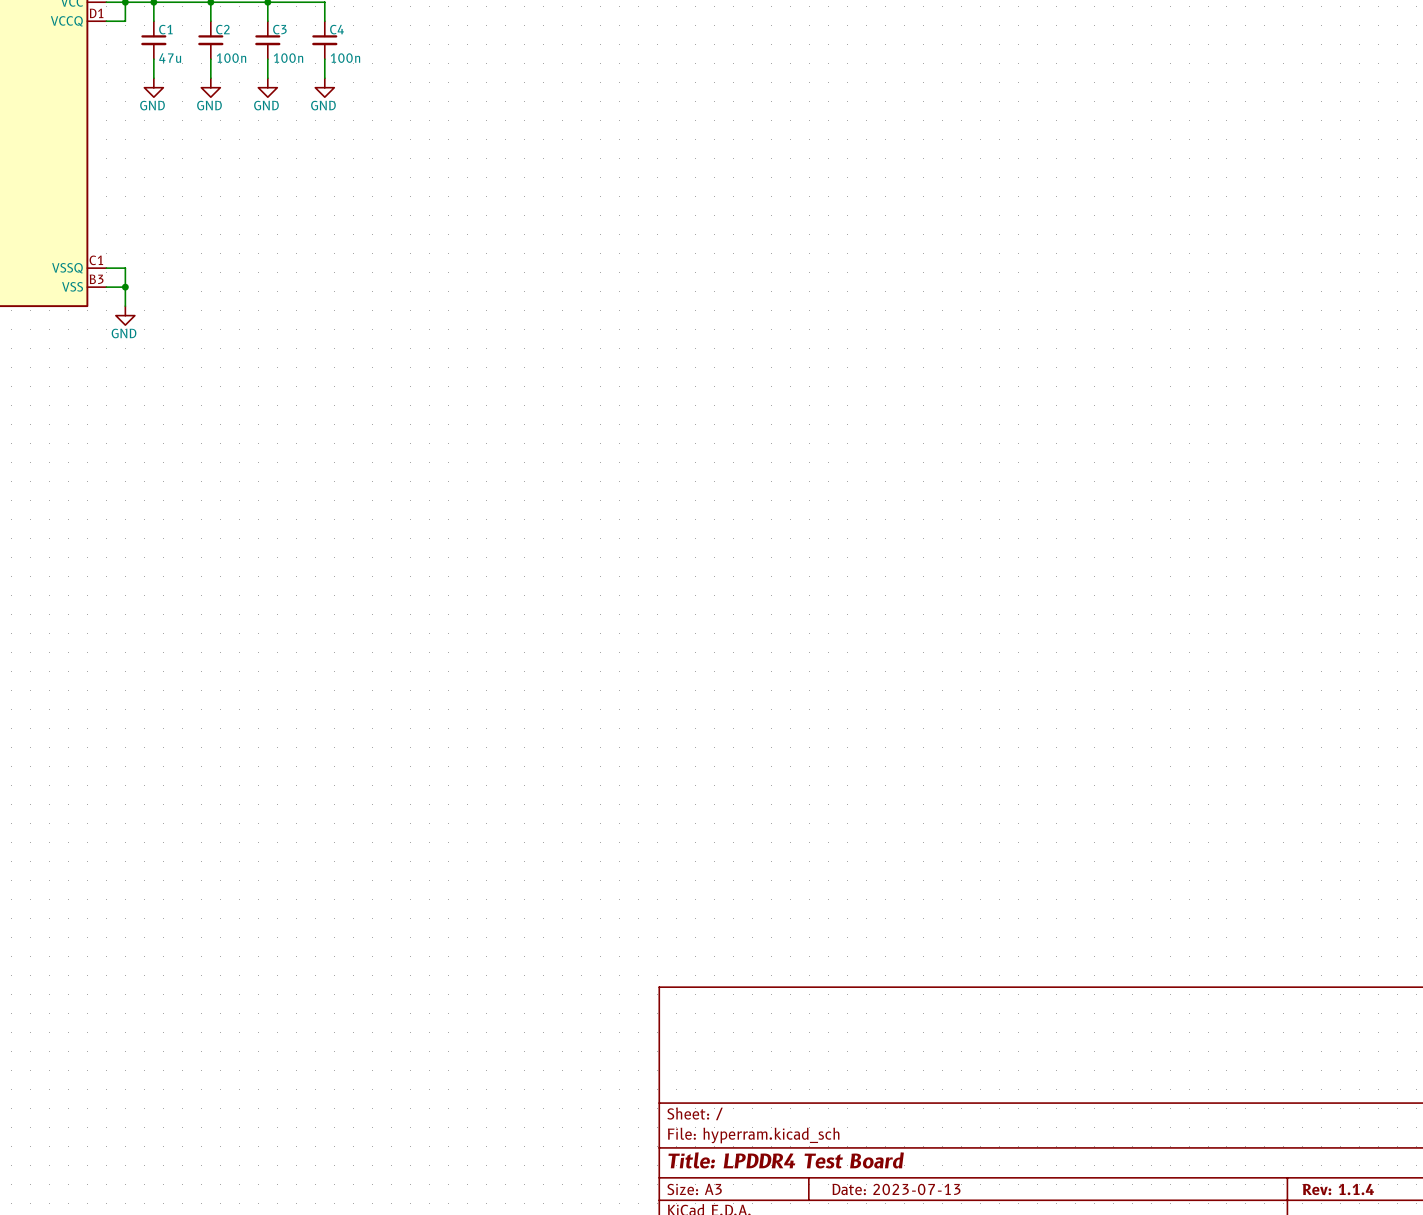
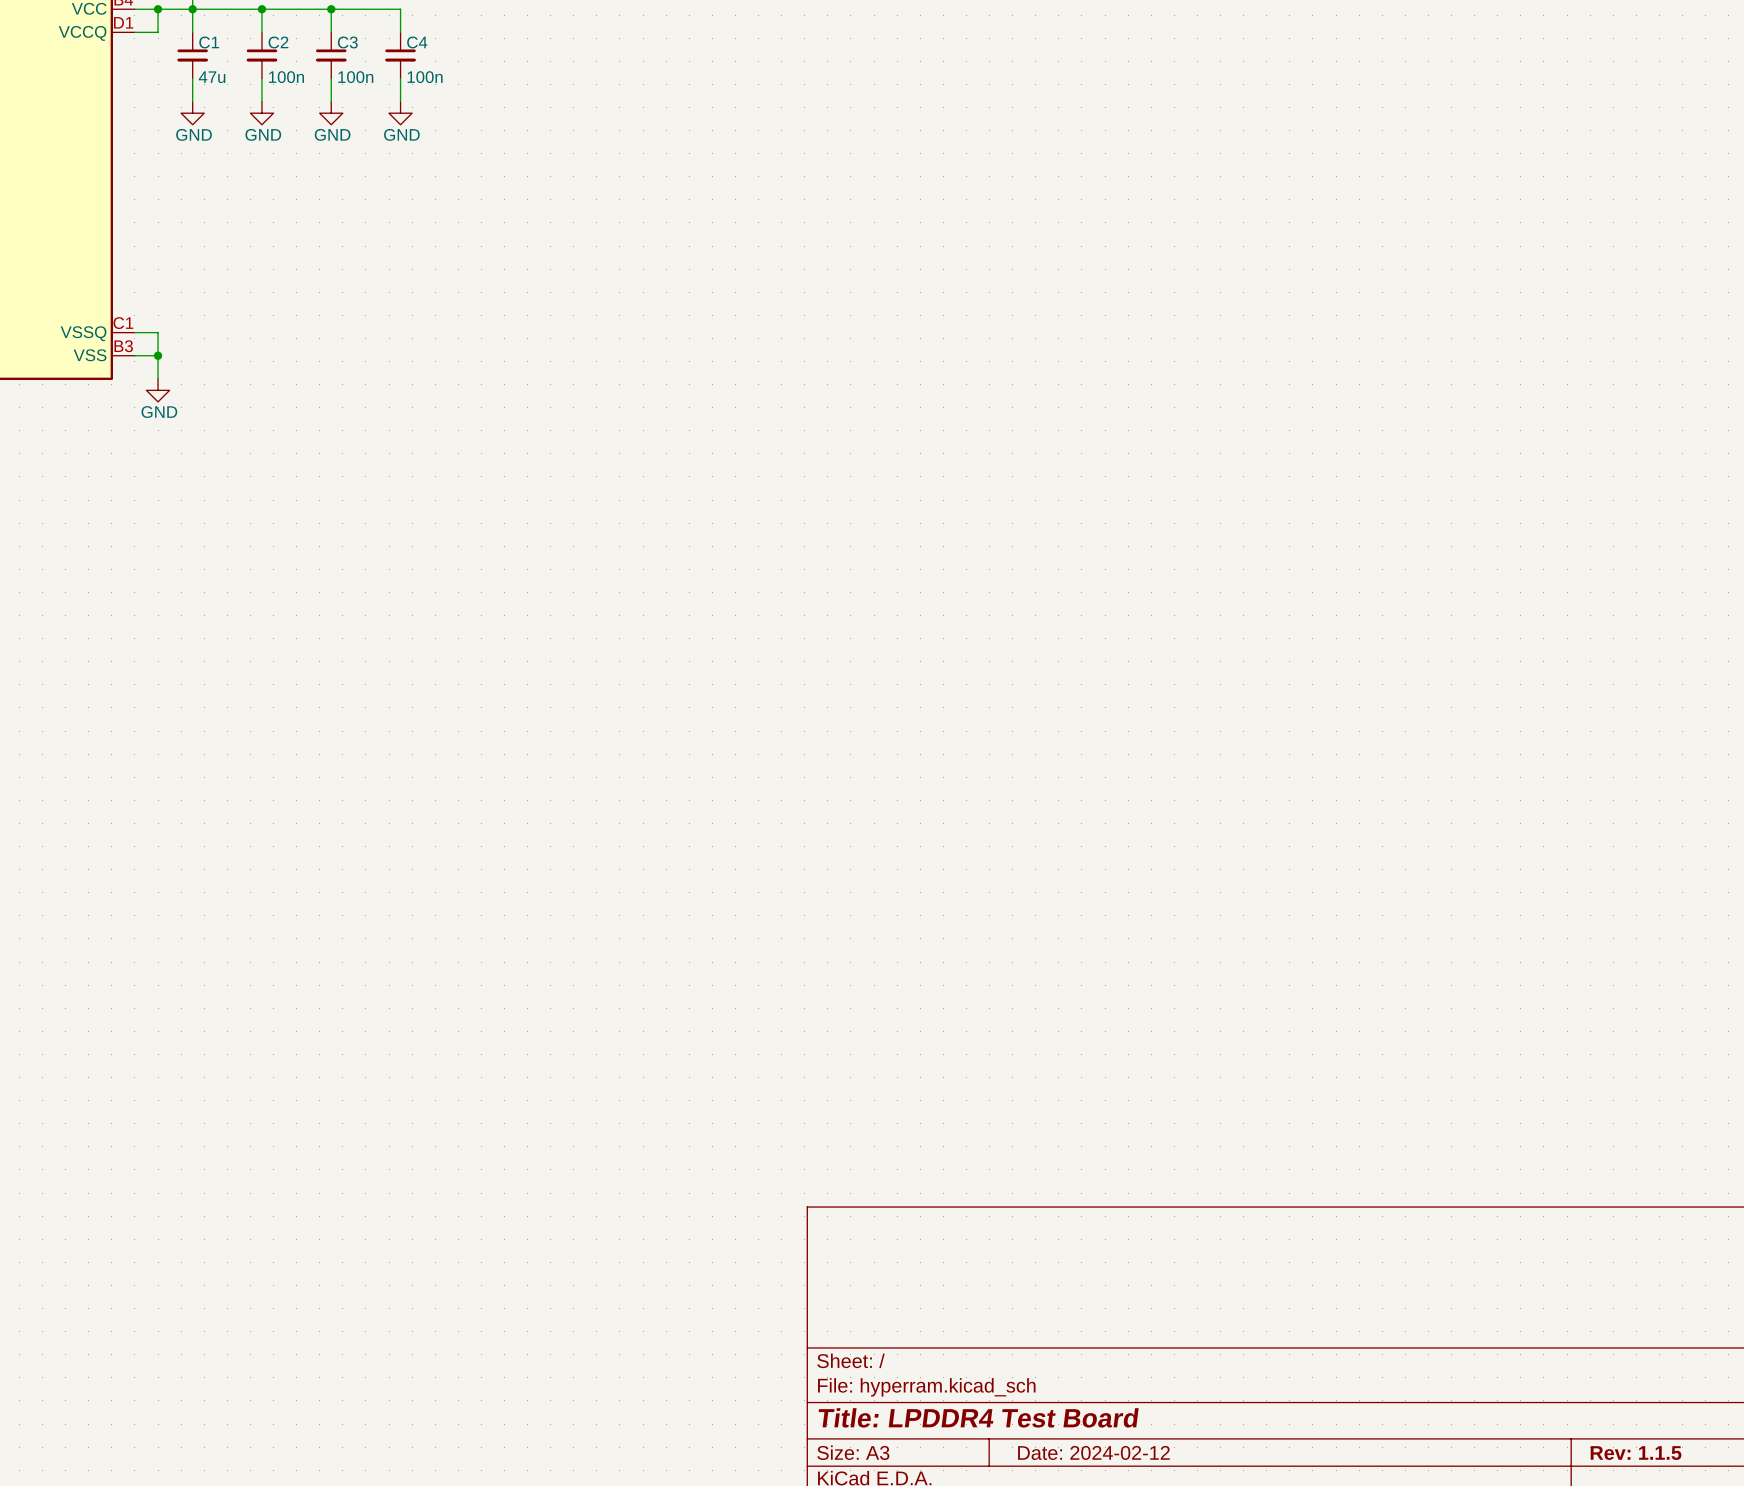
title block: Date: 2023-07-13 (896, 1189) -> Date: 2024-02-12 (1093, 1452)
title block: Rev: 1.1.4 (1338, 1189) -> Rev: 1.1.5 (1636, 1453)

